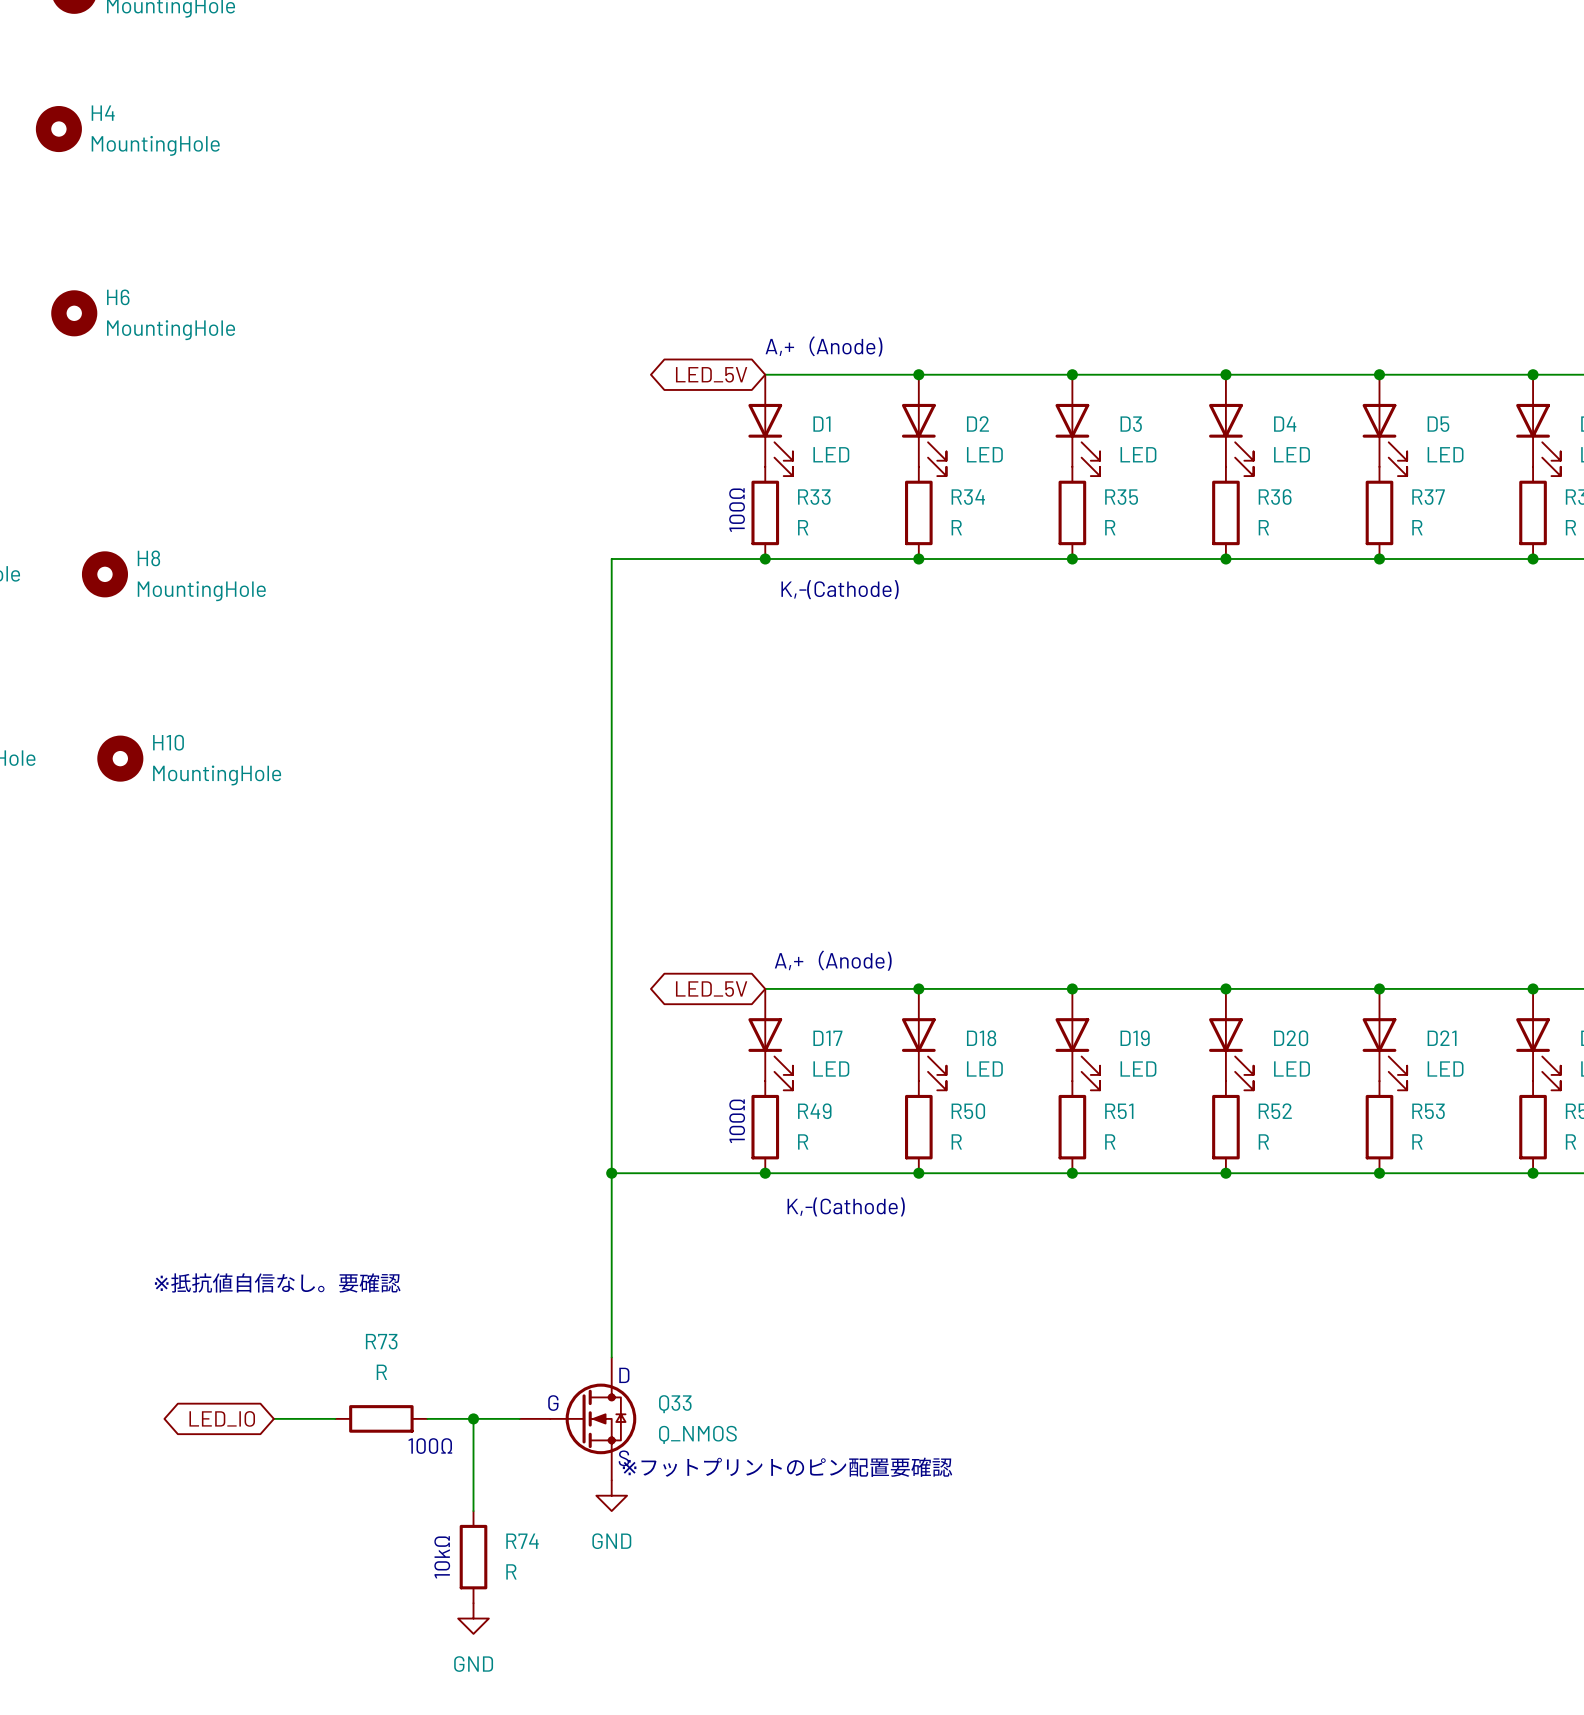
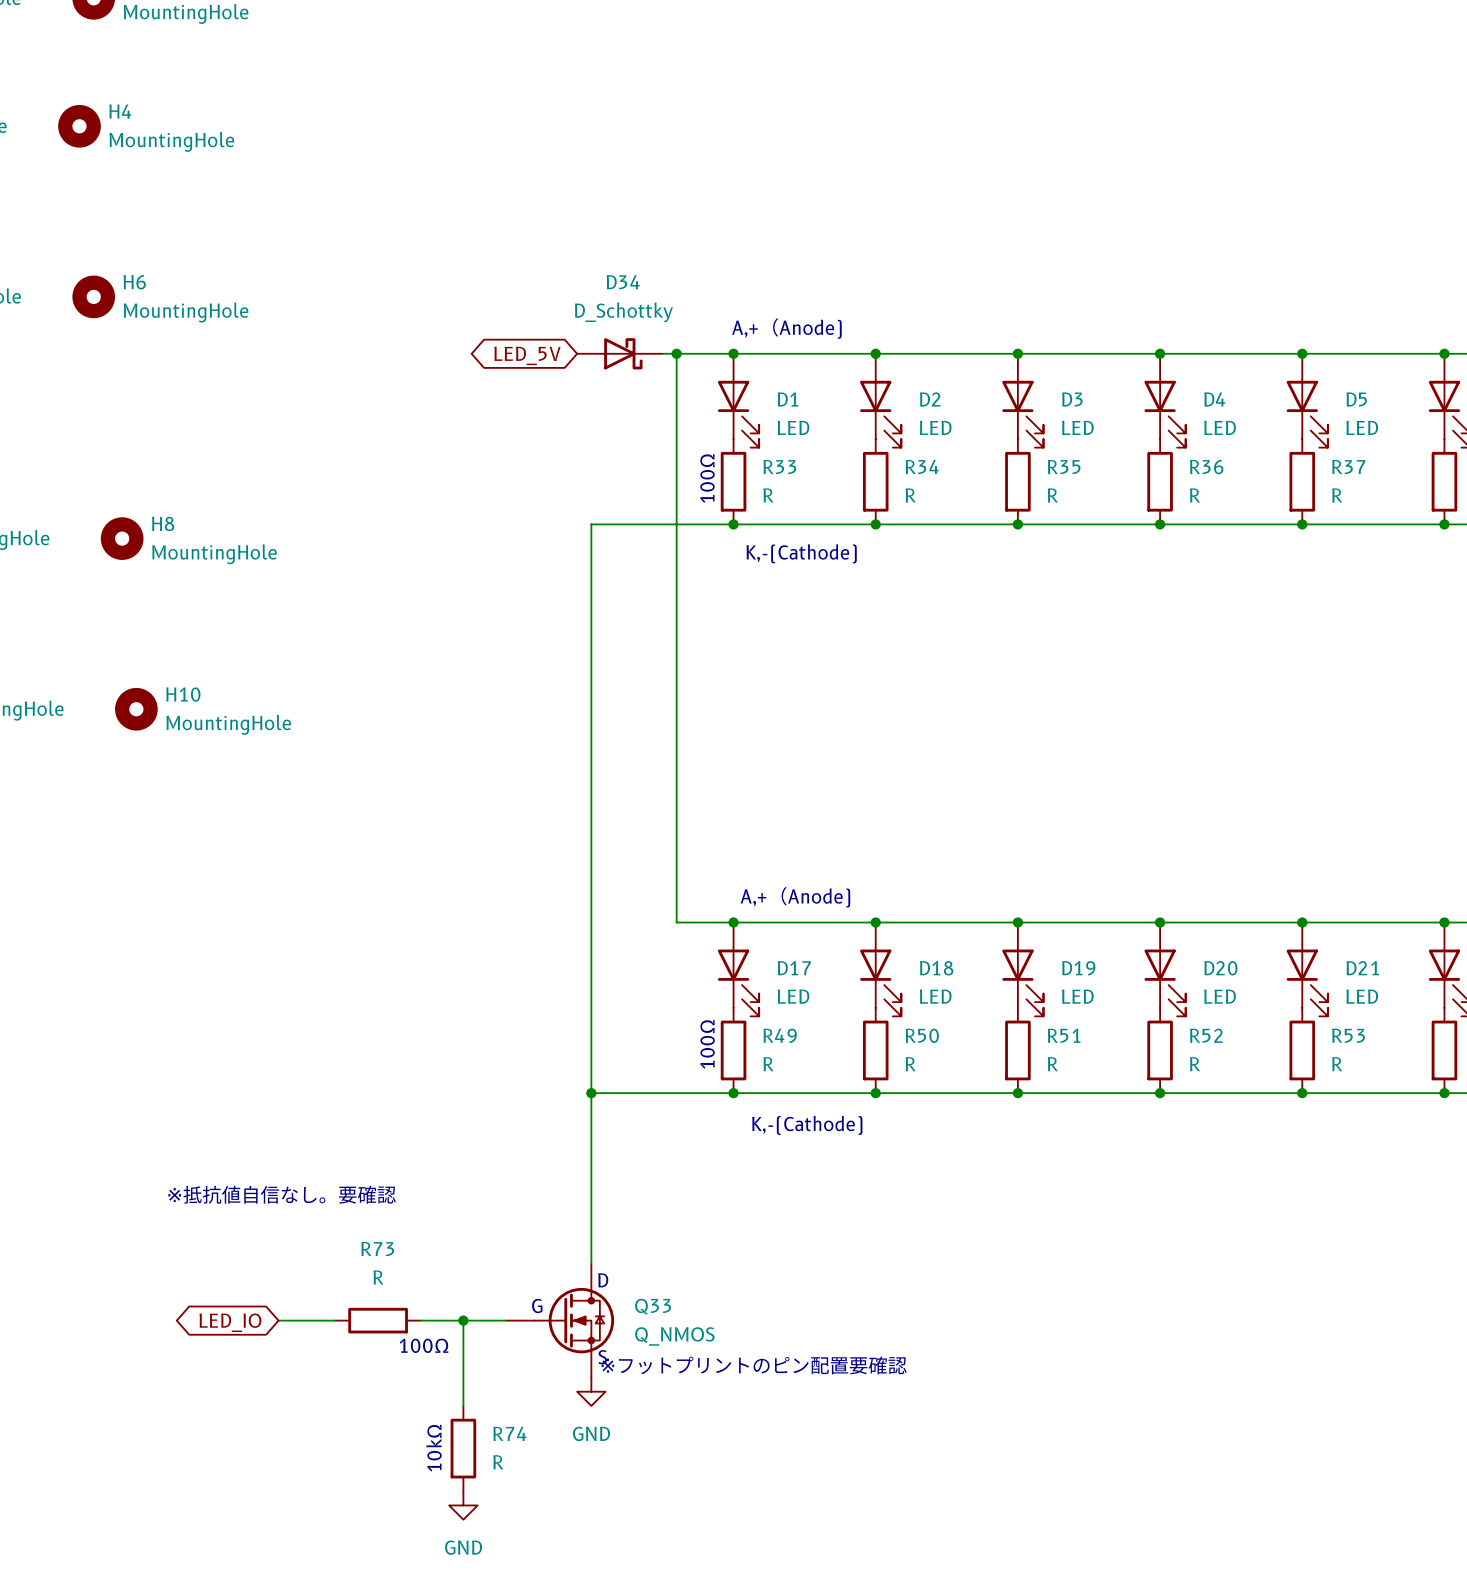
D34: none -> D_Schottky (619, 353)
wire: none -> (662, 353) (733, 353)
wire: none -> (676, 353) (676, 922) (733, 922)
junction: none -> (676, 353)
global label position: LED_5V (711, 374) -> LED_5V (527, 355)
junction: none -> (733, 353)
junction: none -> (733, 922)
global label: LED_5V (711, 989) -> none

